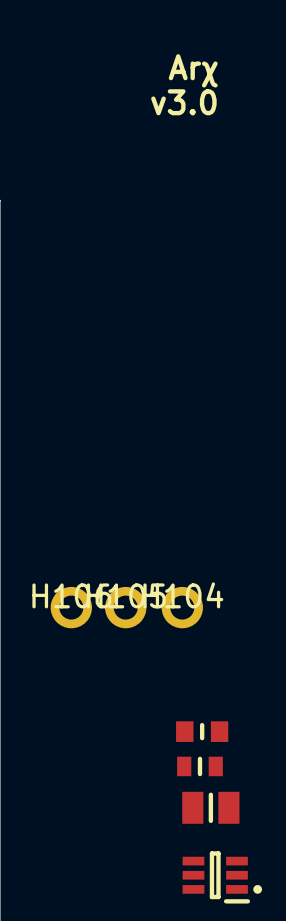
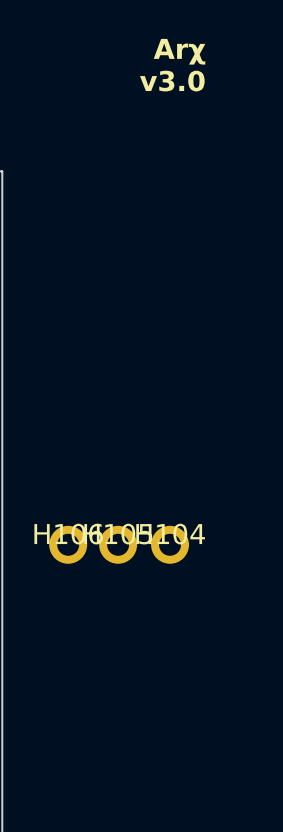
part: (202, 731) -> none
part: (199, 766) -> none
part: (210, 807) -> none
part: (222, 877) -> none

